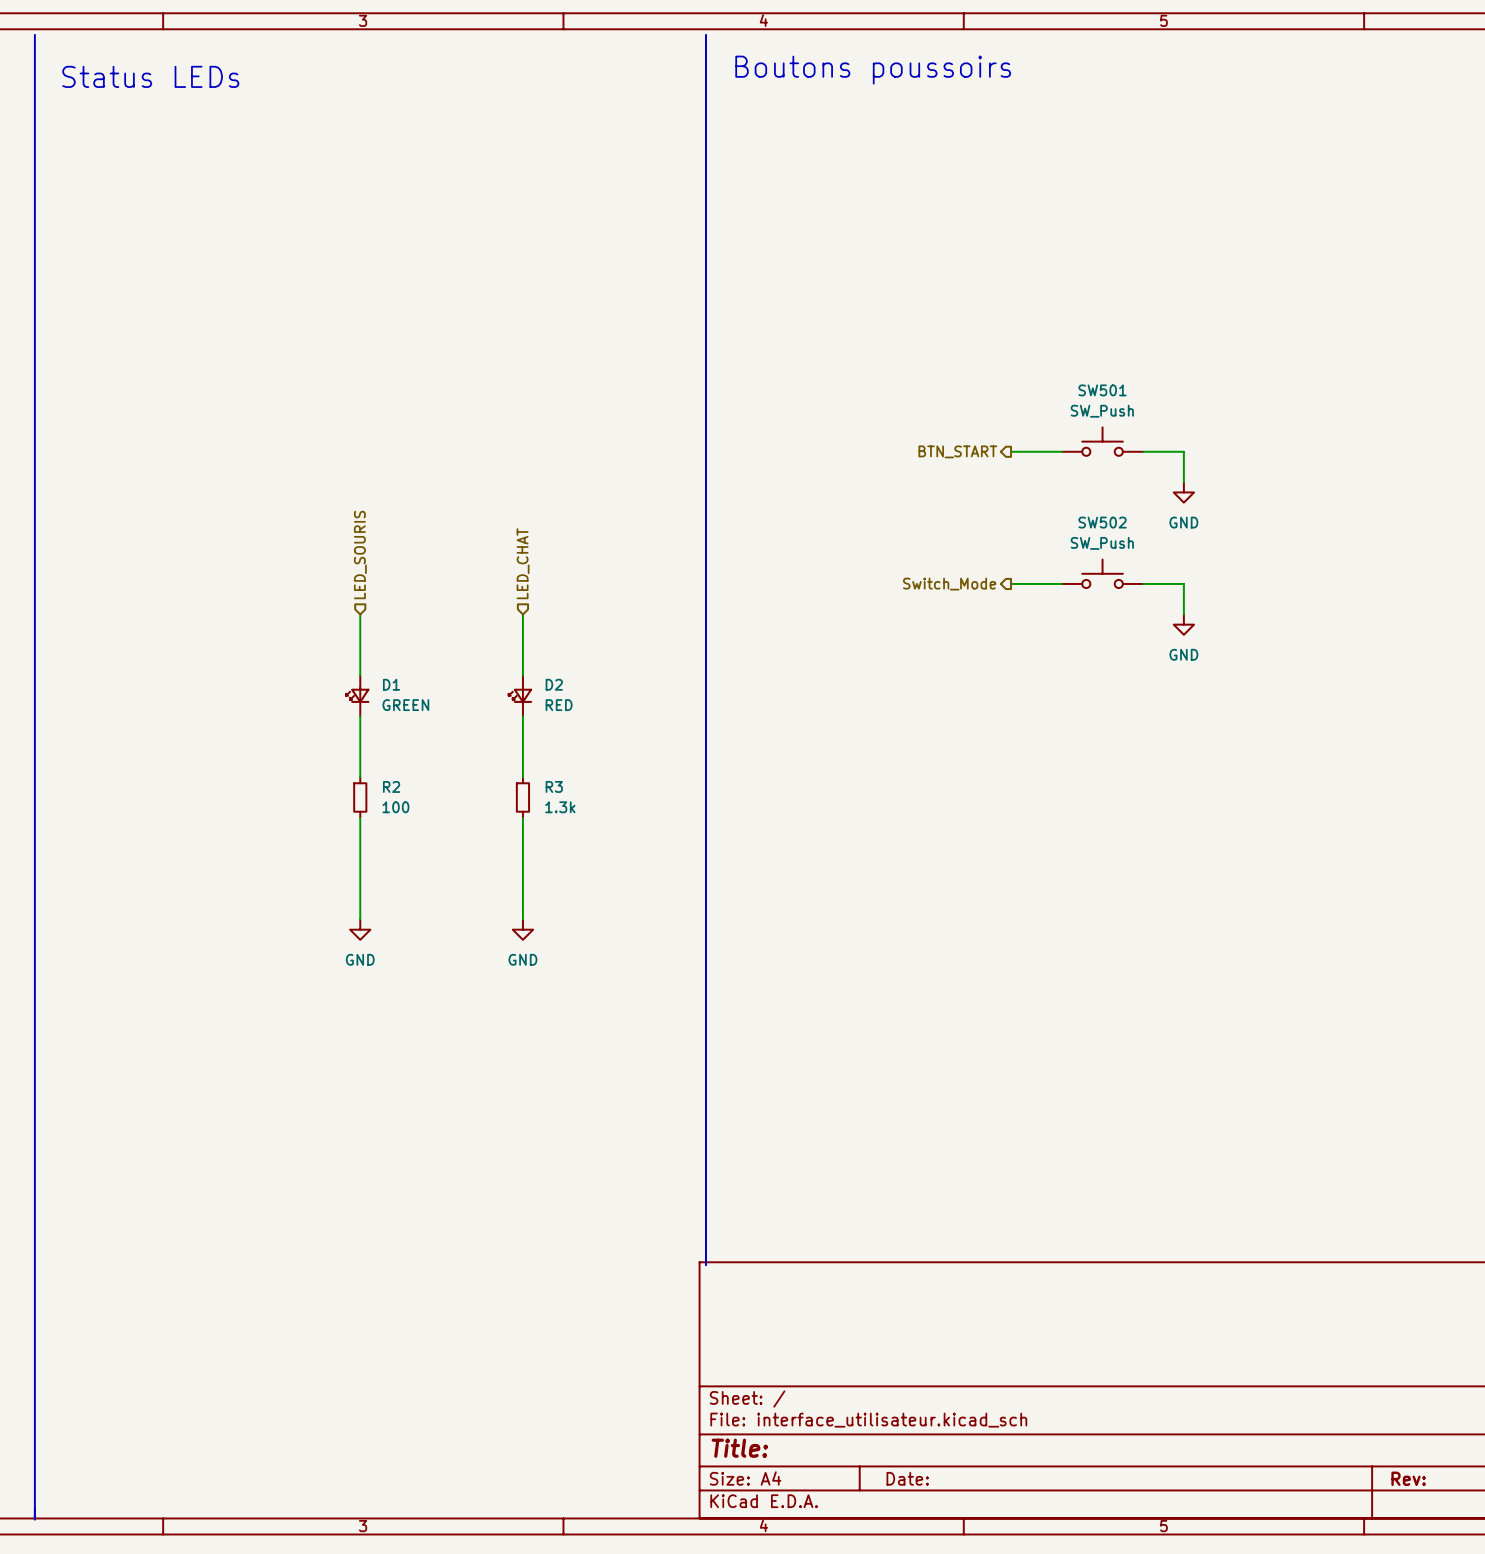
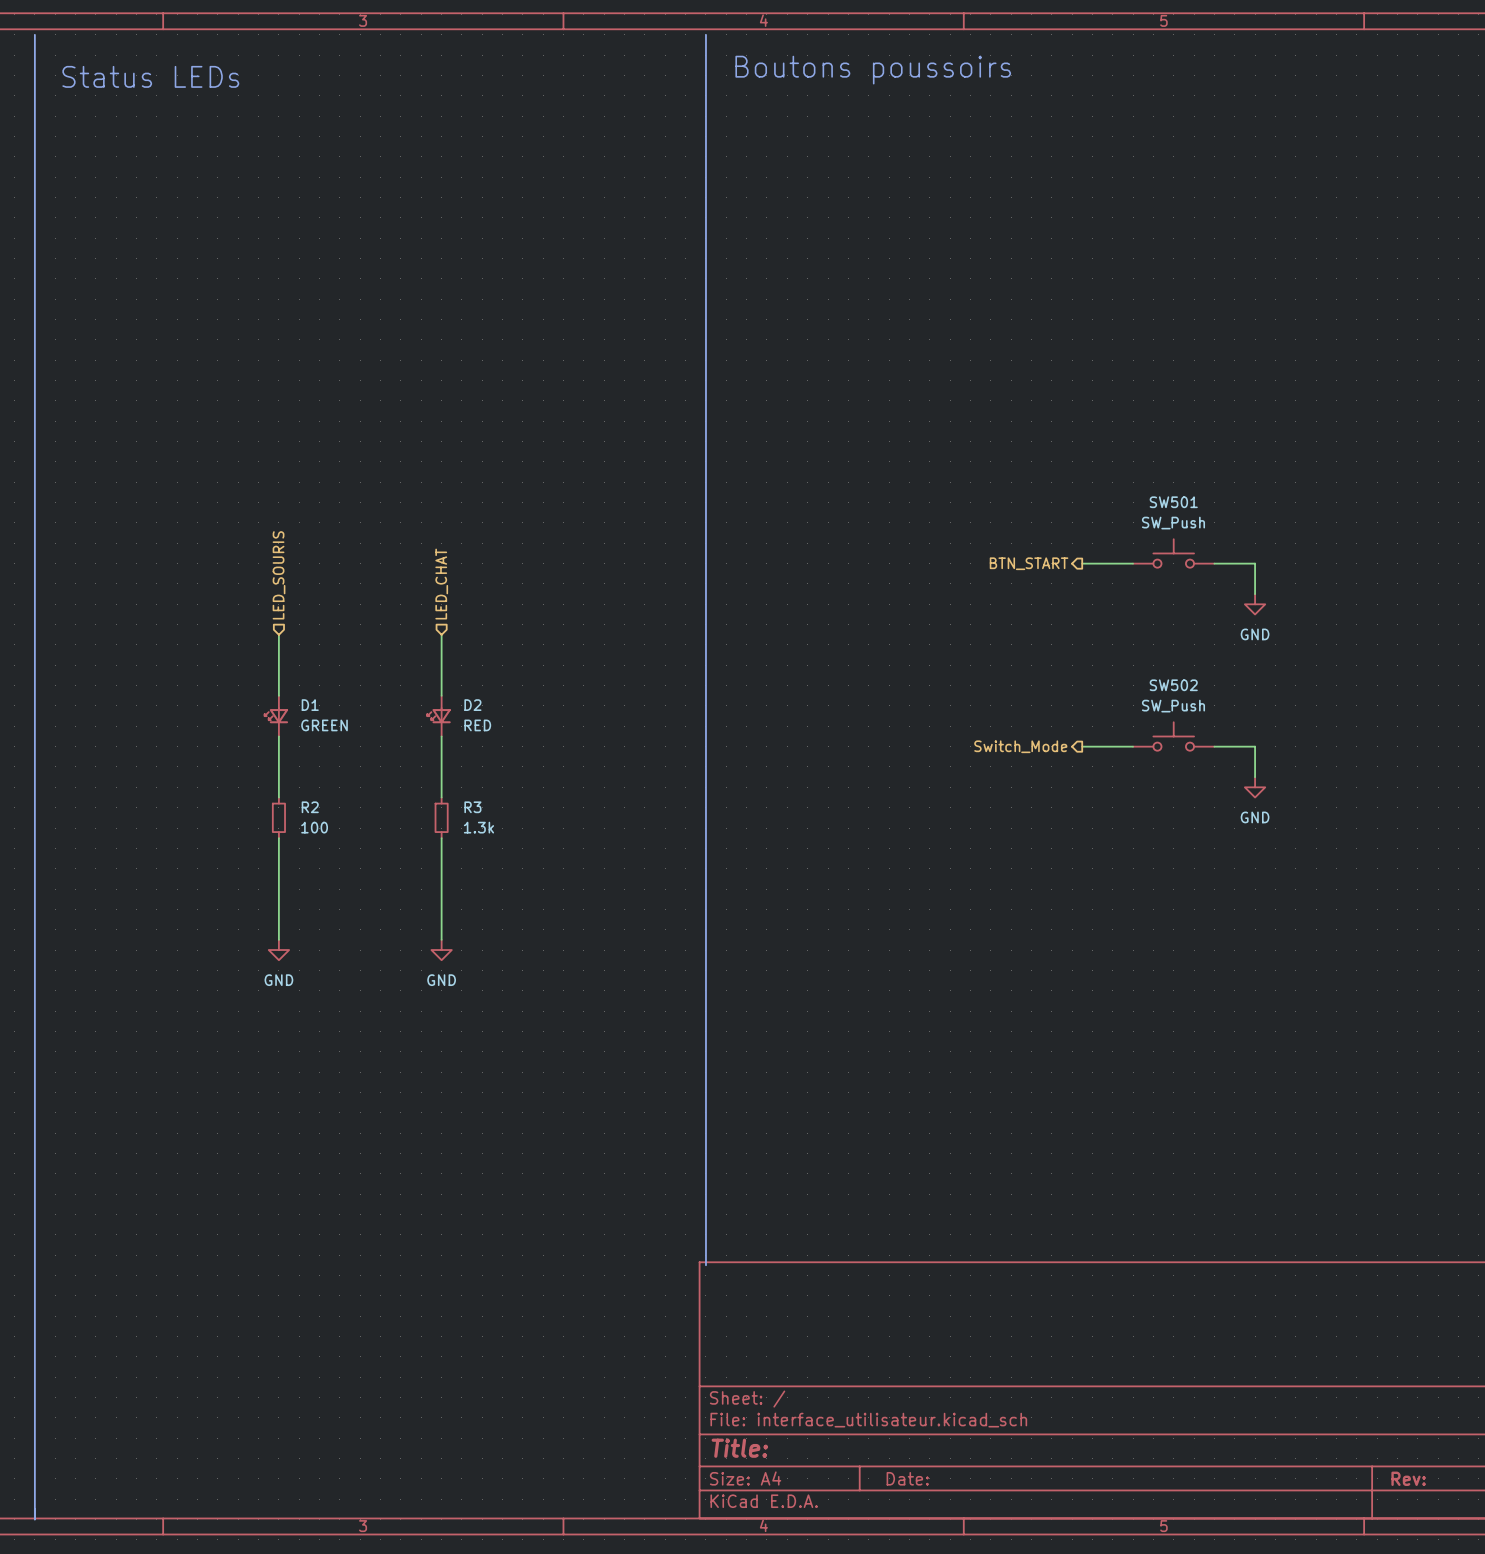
SW501 position: (1102, 441) -> (1173, 553)
hierarchical label position: BTN_START (957, 451) -> BTN_START (1029, 563)
wire: (1011, 451) (1061, 451) -> none
wire: (1143, 451) (1183, 451) (1183, 482) -> none
power symbol: GND (1183, 492) -> none
hierarchical label position: LED_SOURIS (360, 555) -> LED_SOURIS (279, 575)
hierarchical label position: LED_CHAT (523, 563) -> LED_CHAT (441, 584)
SW502 position: (1102, 573) -> (1173, 736)
wire: (1011, 583) (1061, 583) -> (1082, 563) (1133, 563)
wire: (1143, 583) (1183, 583) (1183, 614) -> (1214, 563) (1255, 563) (1255, 594)
hierarchical label position: Switch_Mode (949, 584) -> Switch_Mode (1020, 746)
power symbol: none -> GND (1255, 604)
wire: (360, 614) (360, 675) -> (278, 634) (278, 695)
wire: (522, 614) (522, 675) -> (441, 634) (441, 695)
power symbol: GND (1183, 624) -> none
D1 position: (357, 695) -> (276, 716)
D2 position: (520, 695) -> (439, 716)
wire: (360, 716) (360, 777) -> (278, 736) (278, 797)
wire: (522, 716) (522, 777) -> (441, 736) (441, 797)
wire: none -> (1082, 746) (1133, 746)
wire: none -> (1214, 746) (1255, 746) (1255, 777)
power symbol: none -> GND (1255, 787)
R2 position: (360, 797) -> (278, 817)
R3 position: (522, 797) -> (441, 817)
wire: (360, 817) (360, 919) -> (278, 838) (278, 939)
wire: (522, 817) (522, 919) -> (441, 838) (441, 939)
power symbol: GND (360, 929) -> none
power symbol: GND (522, 929) -> none
power symbol: none -> GND (278, 950)
power symbol: none -> GND (441, 950)

